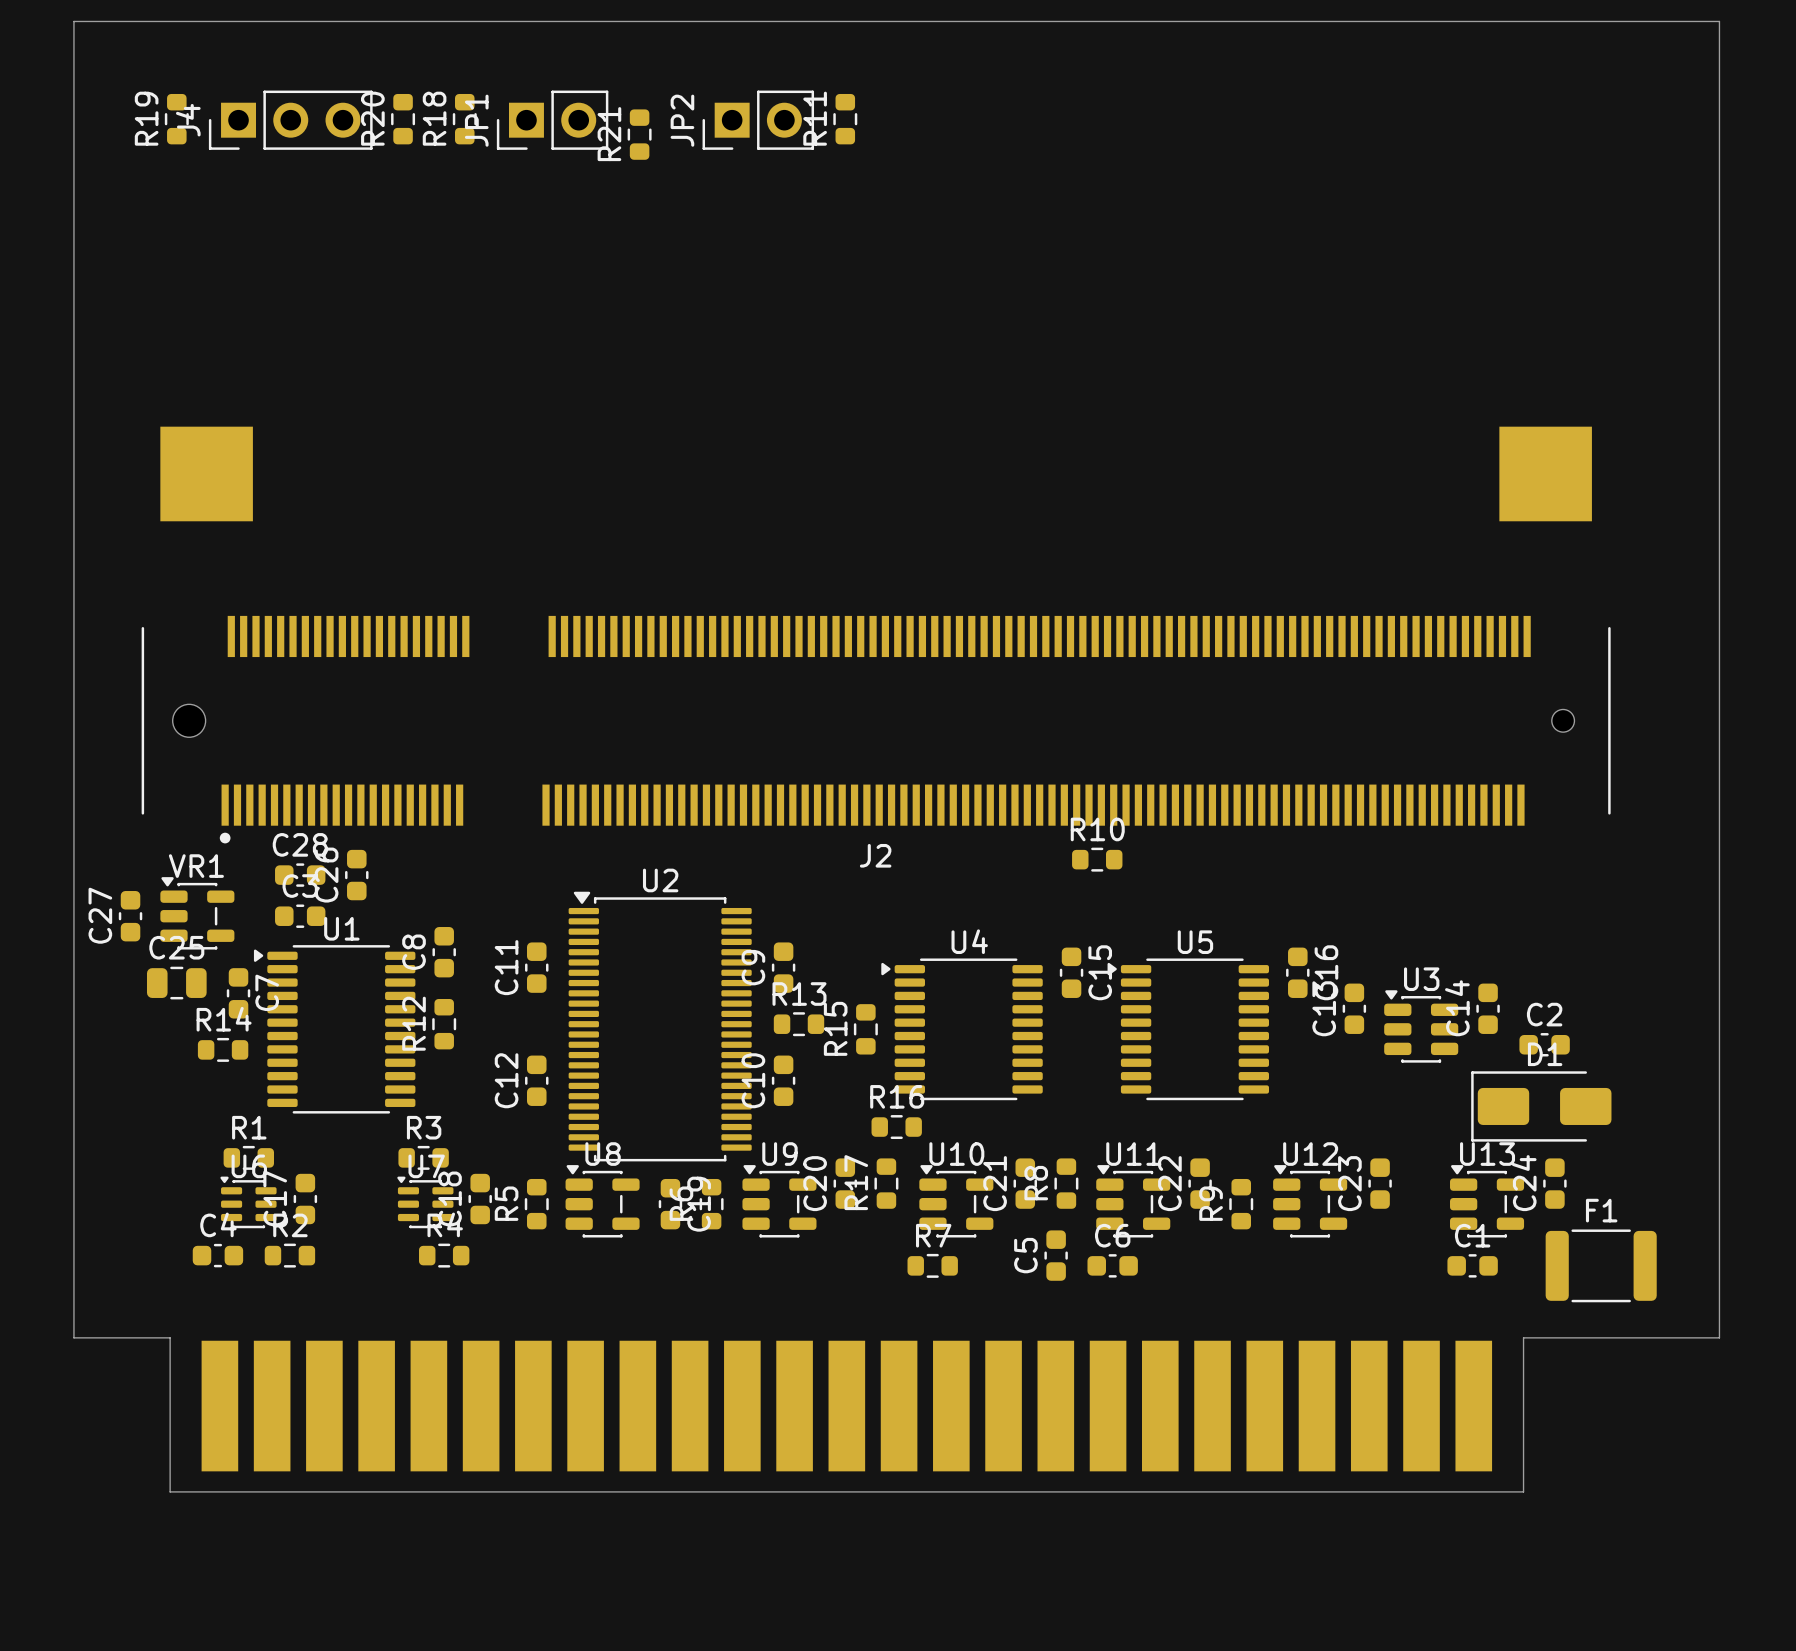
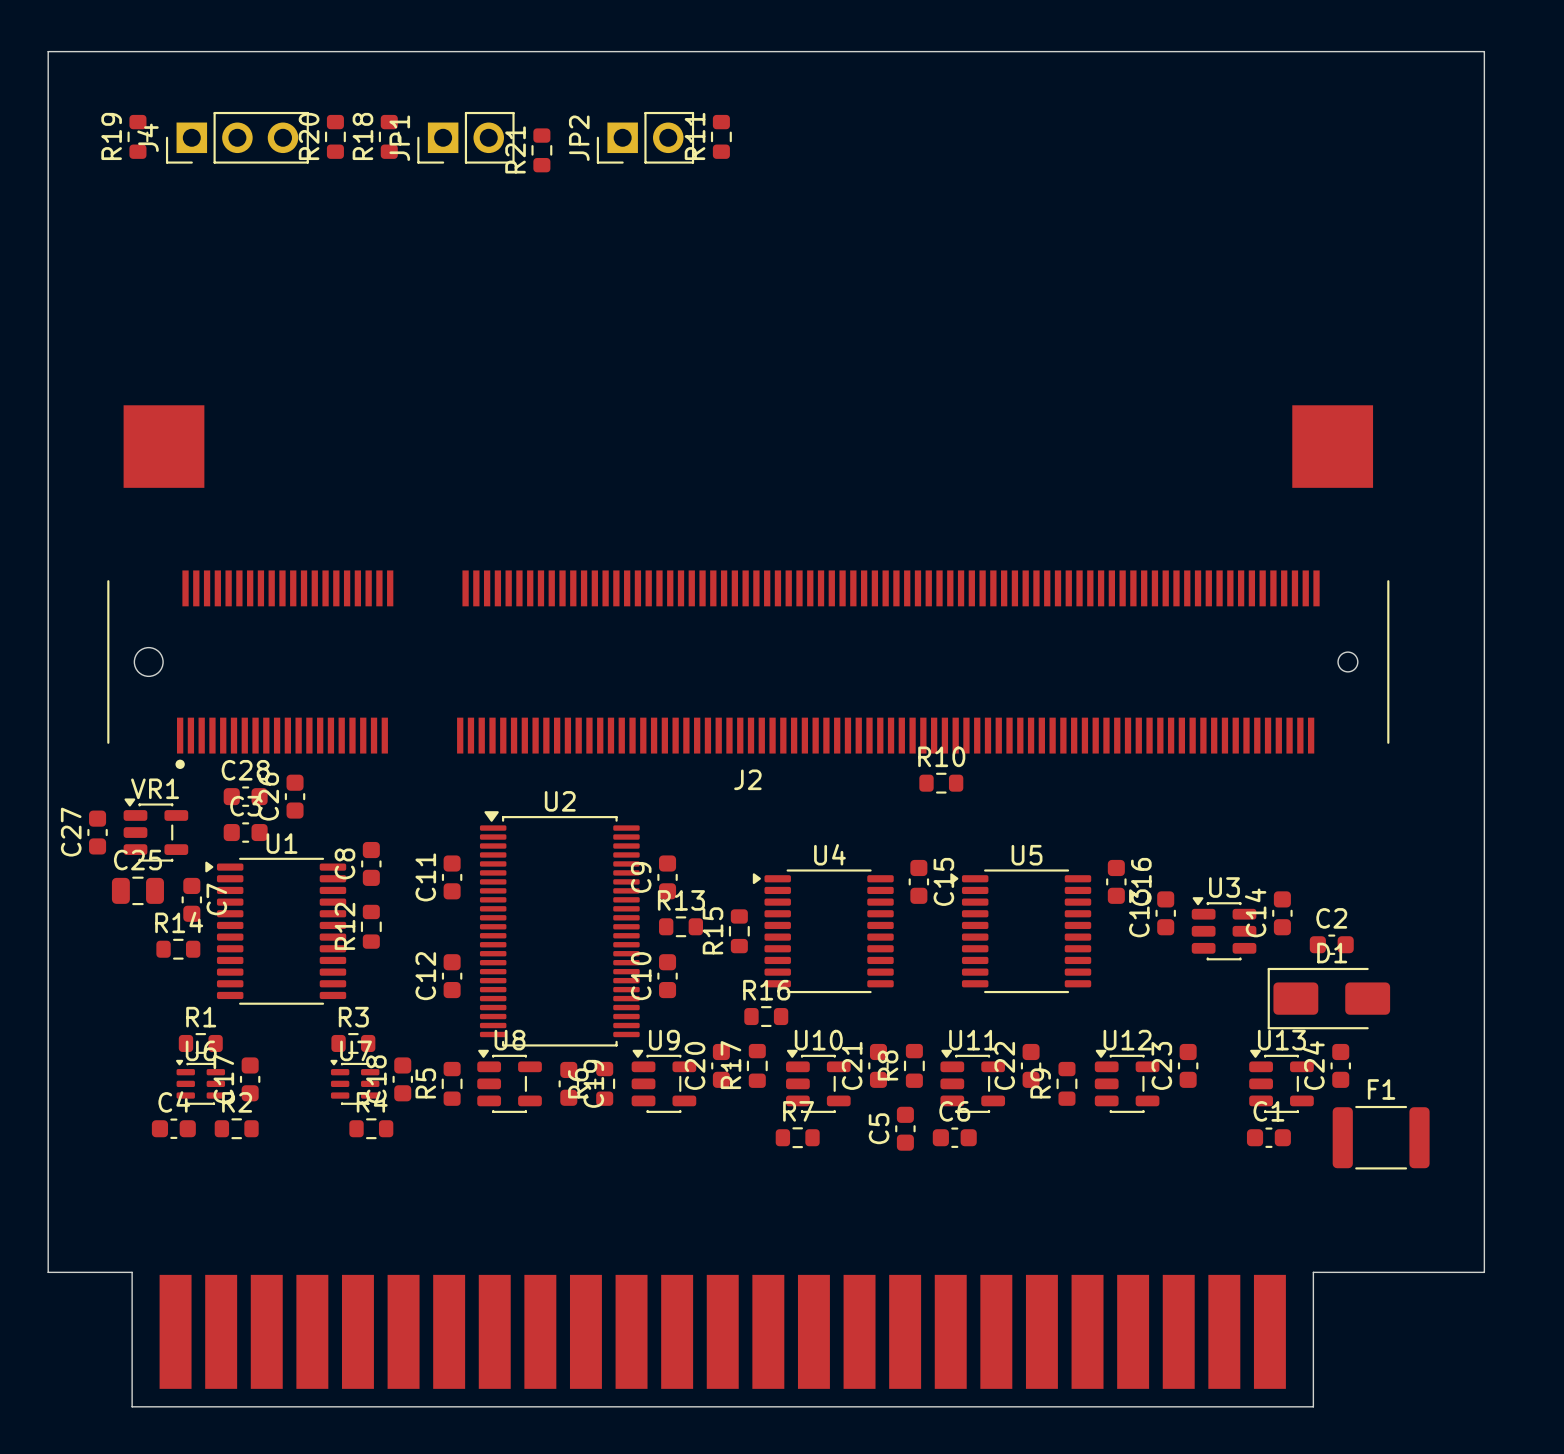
board edge: (73, 1337) (170, 1337) (170, 1420) -> (48, 1200) (48, 1272) (132, 1272)
board edge: (1719, 1337) (1523, 1337) (1523, 1420) -> (1484, 1200) (1484, 1272) (1313, 1272)
part position: (846, 1406) -> (722, 1331)
board edge: (170, 1491) (1523, 1491) -> (132, 1335) (132, 1406) (1313, 1406) (1313, 1335)

